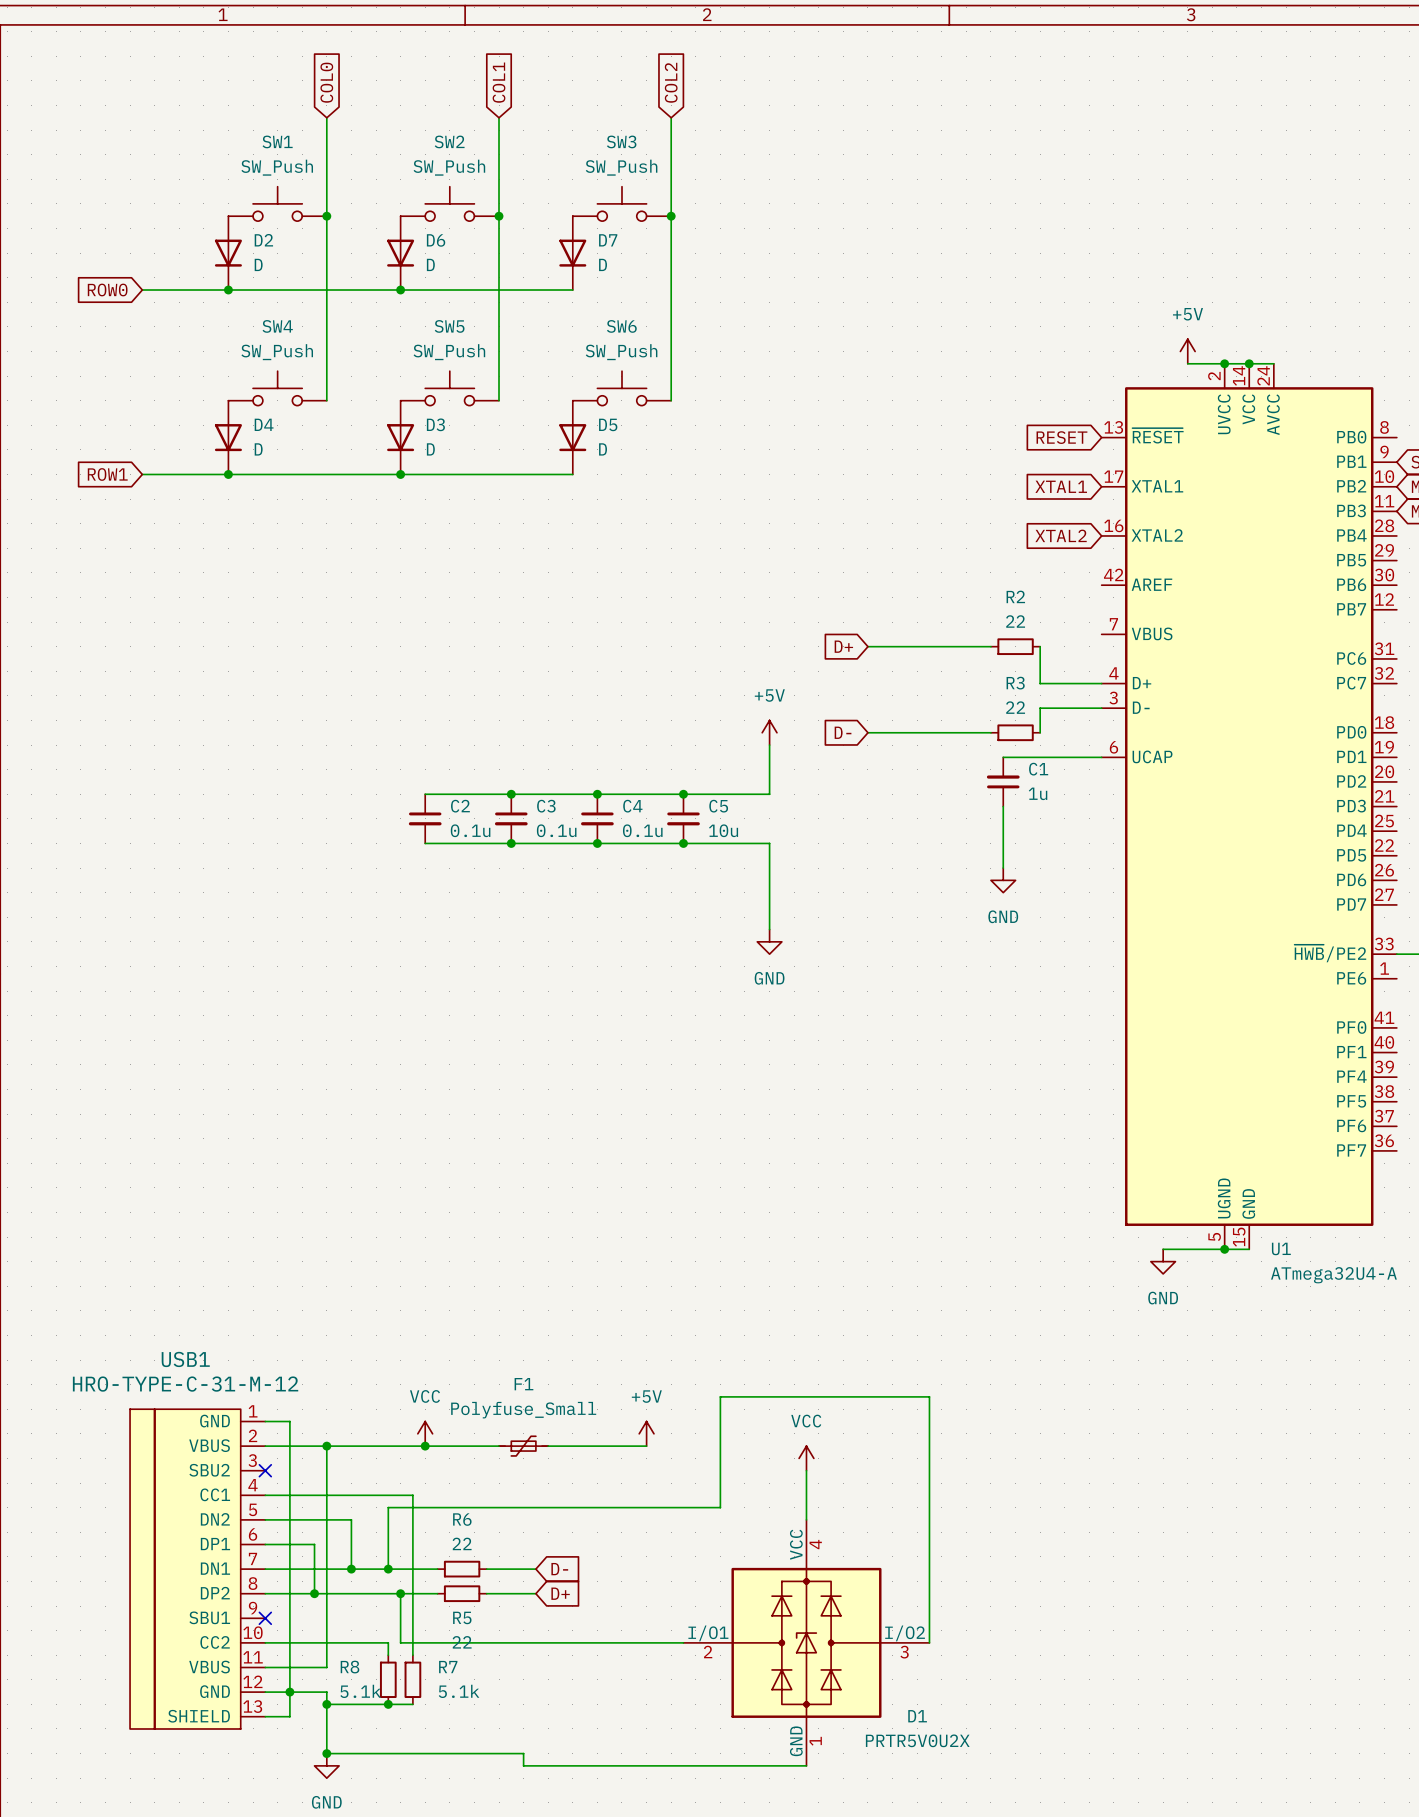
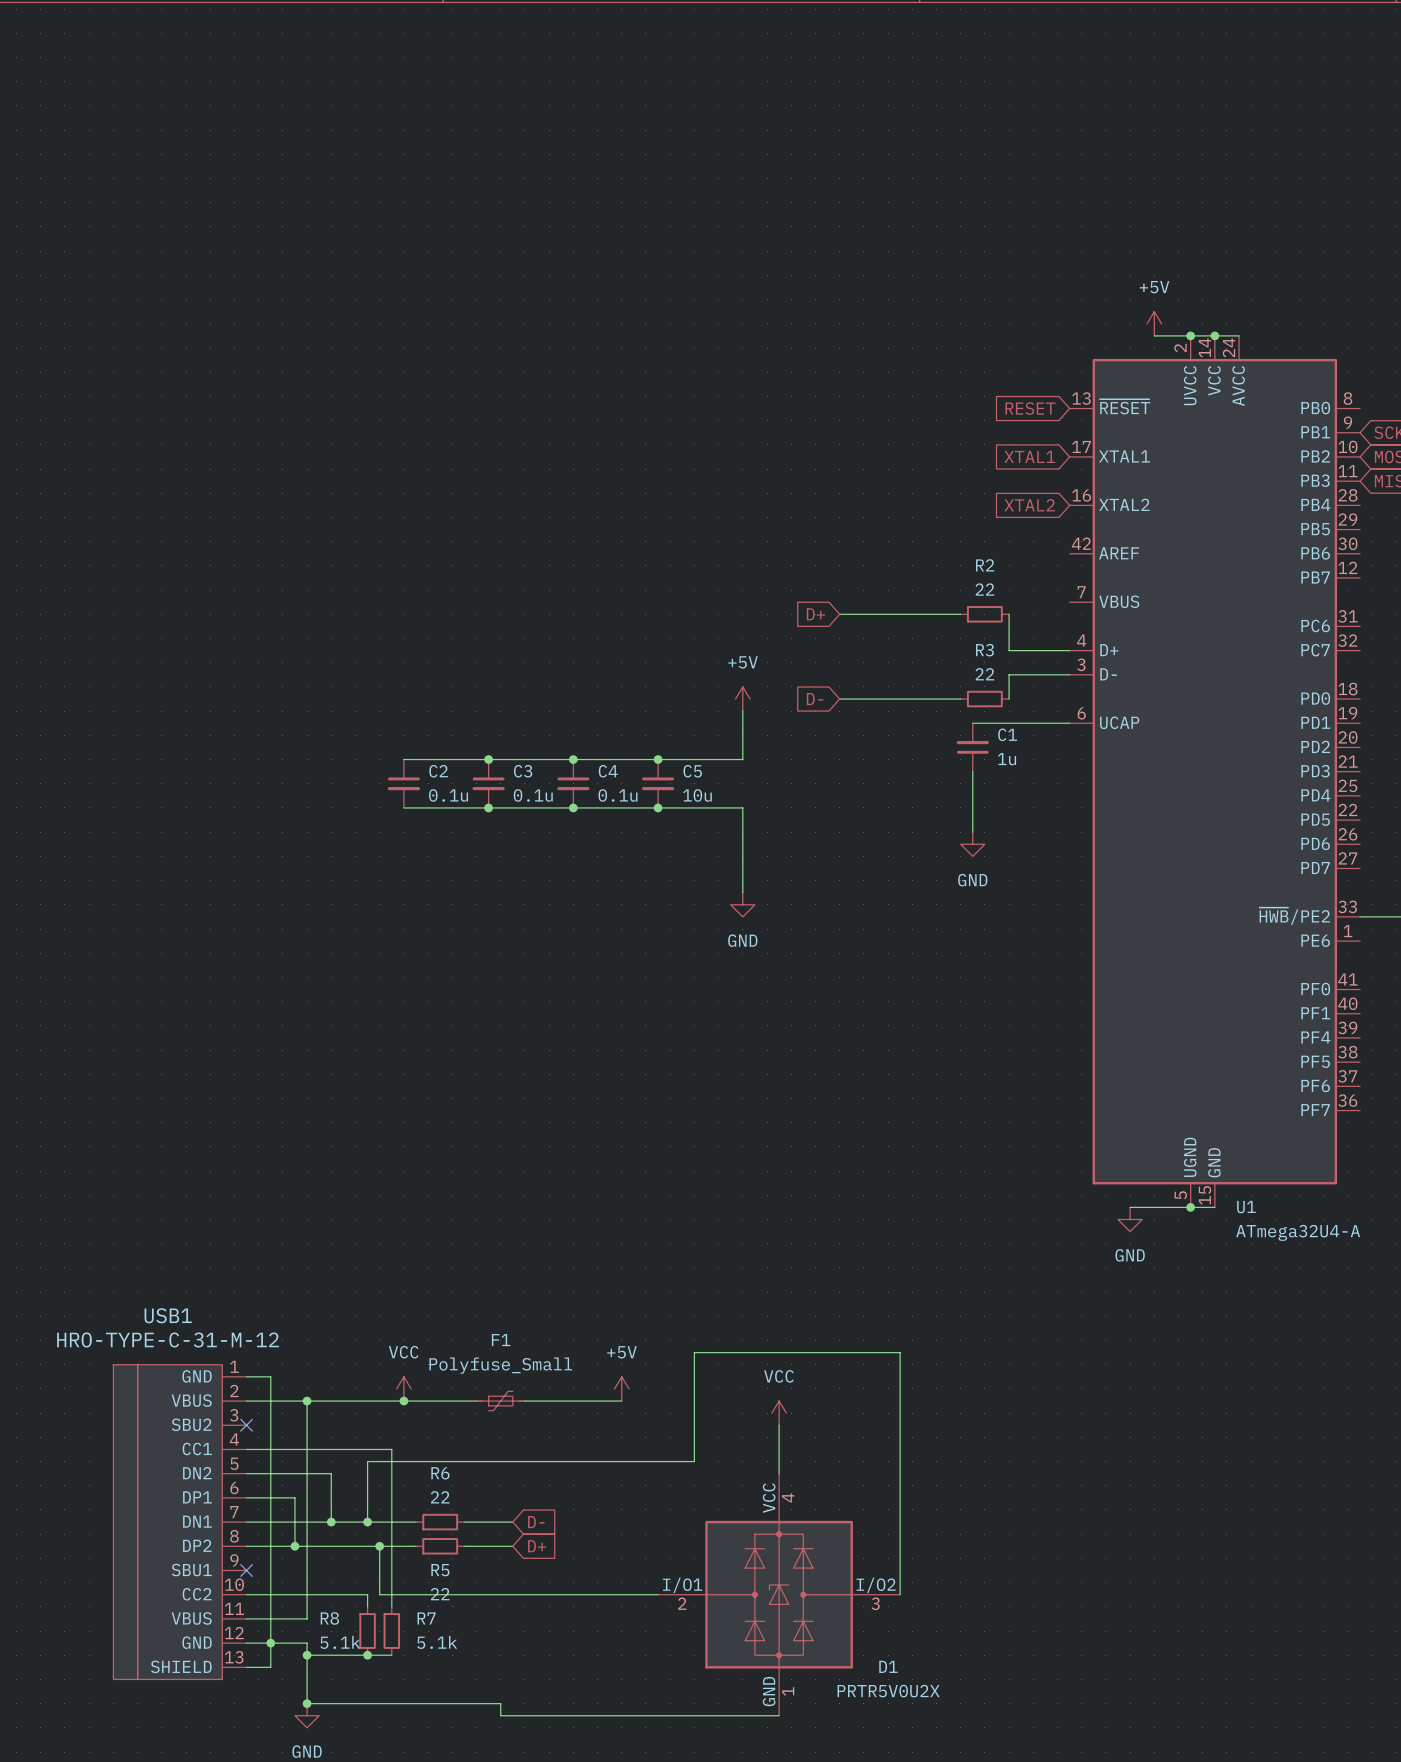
global label: COL0 (326, 82) -> none
global label: COL1 (499, 82) -> none
global label: COL2 (671, 82) -> none
wire: (326, 117) (326, 400) -> none
wire: (499, 117) (499, 400) -> none
wire: (671, 117) (671, 400) -> none
SW1: SW_Push (277, 203) -> none
SW2: SW_Push (449, 203) -> none
SW3: SW_Push (621, 203) -> none
junction: (326, 216) -> none
junction: (499, 216) -> none
junction: (671, 216) -> none
D2: D (228, 253) -> none
D6: D (400, 253) -> none
D7: D (572, 253) -> none
global label: ROW0 (107, 290) -> none
wire: (142, 290) (572, 290) -> none
junction: (228, 290) -> none
junction: (400, 290) -> none
SW4: SW_Push (277, 388) -> none
SW5: SW_Push (449, 388) -> none
SW6: SW_Push (621, 388) -> none
D4: D (228, 437) -> none
D3: D (400, 437) -> none
D5: D (572, 437) -> none
global label: ROW1 (107, 474) -> none
wire: (142, 474) (572, 474) -> none
junction: (228, 474) -> none
junction: (400, 474) -> none

